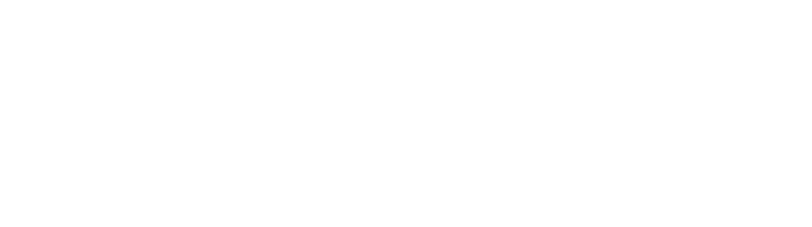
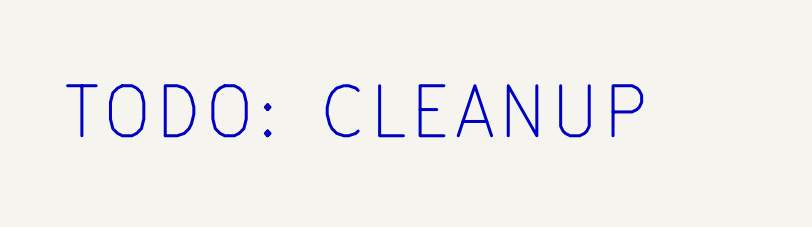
text: none -> TODO: CLEANUP (354, 110)

